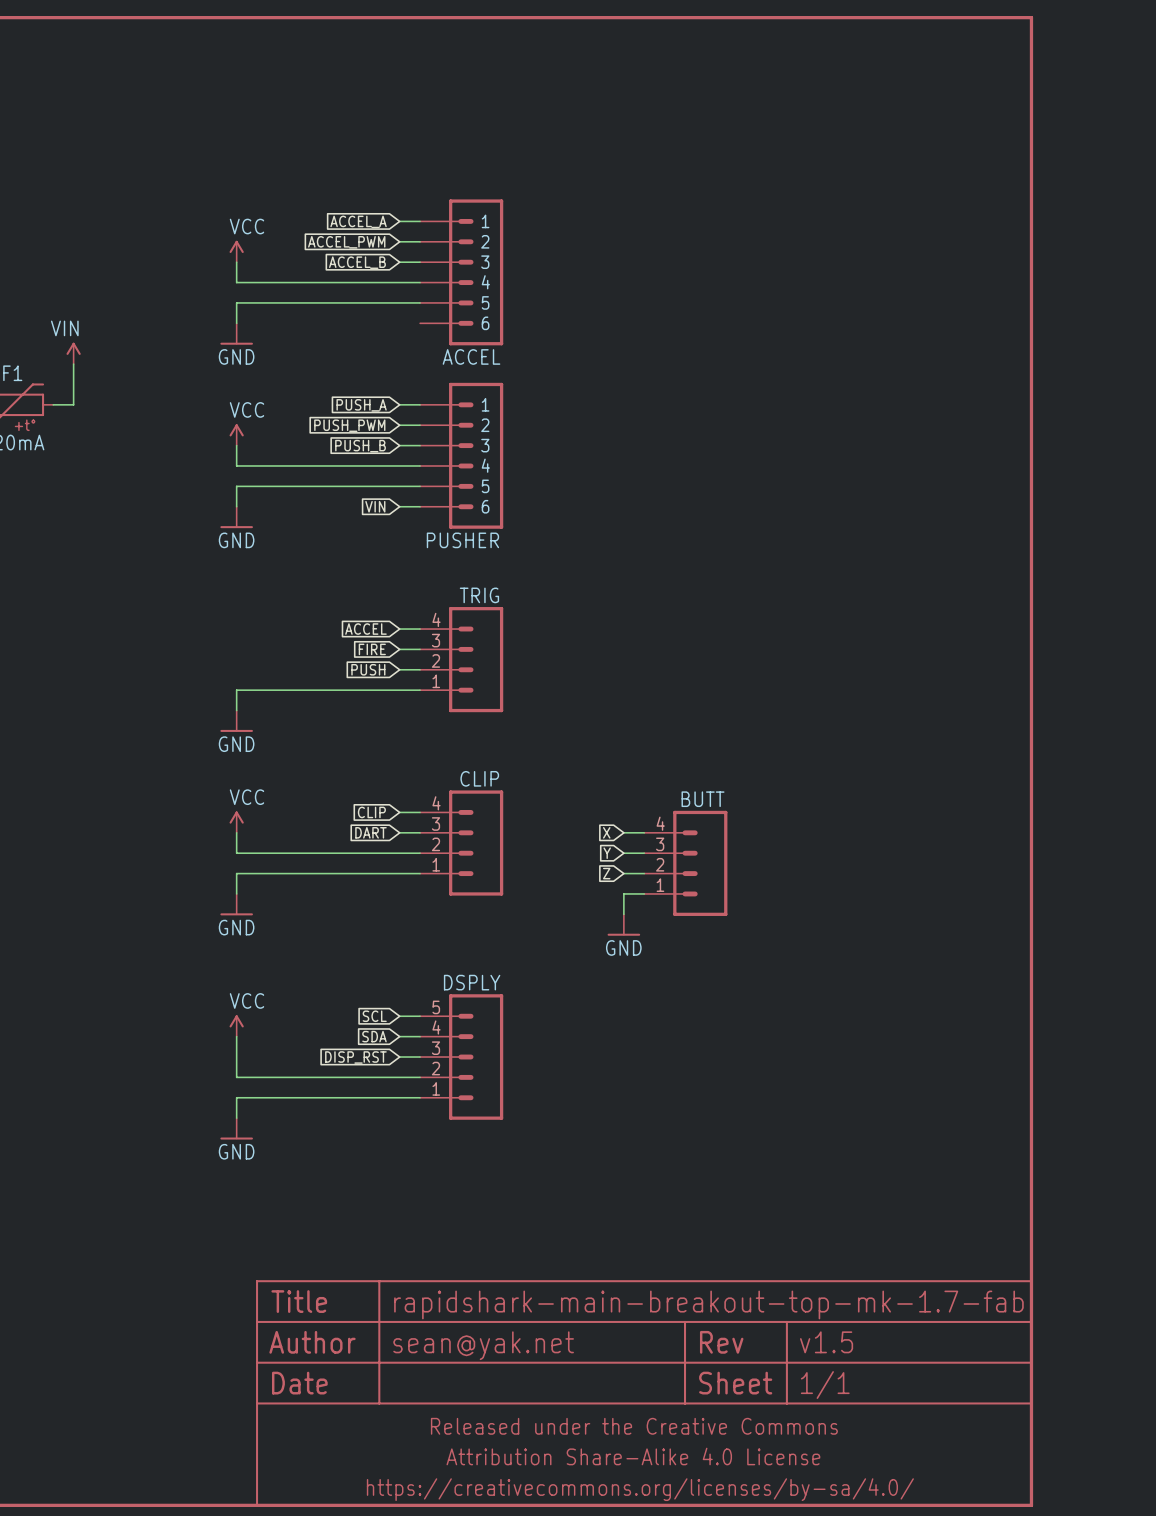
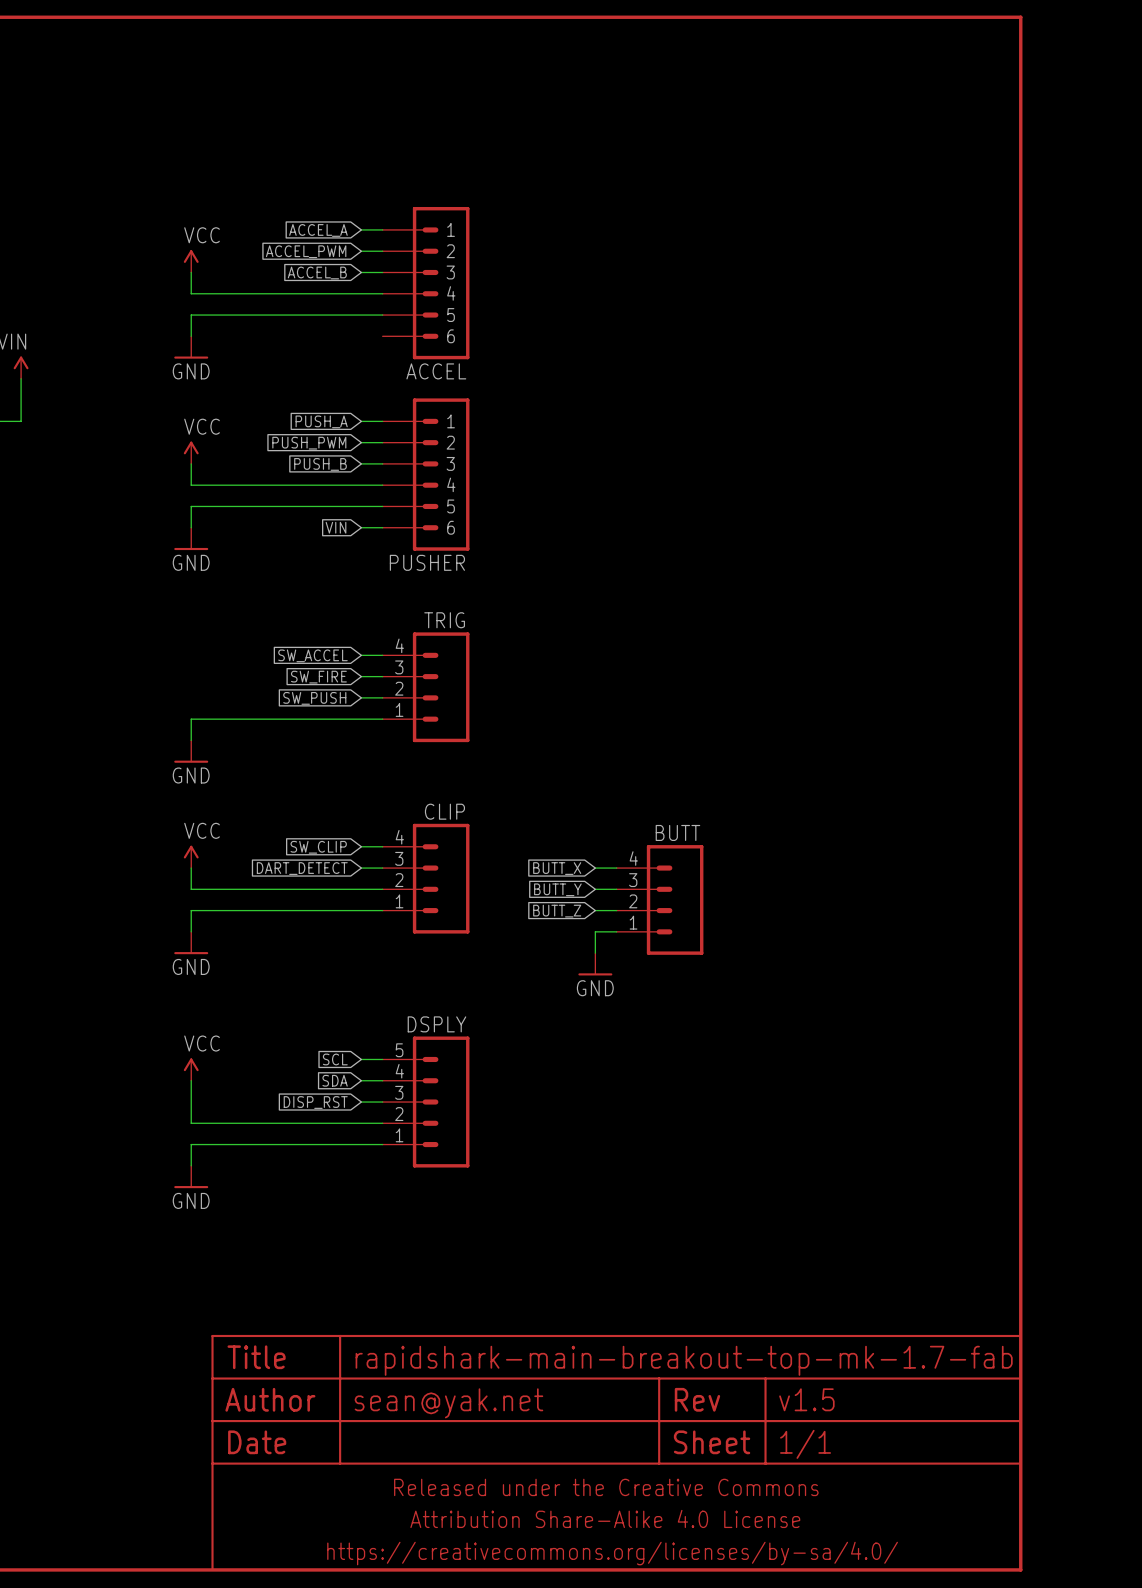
global label: ACCEL (365, 629) -> SW_ACCEL (312, 655)
global label: FIRE (372, 649) -> SW_FIRE (318, 677)
global label: PUSH (368, 669) -> SW_PUSH (314, 698)
global label: CLIP (371, 812) -> SW_CLIP (318, 847)
global label: DART (370, 832) -> DART_DETECT (302, 868)
global label: X (606, 832) -> BUTT_X (557, 868)
global label: Y (607, 853) -> BUTT_Y (557, 889)
global label: Z (606, 873) -> BUTT_Z (557, 911)

